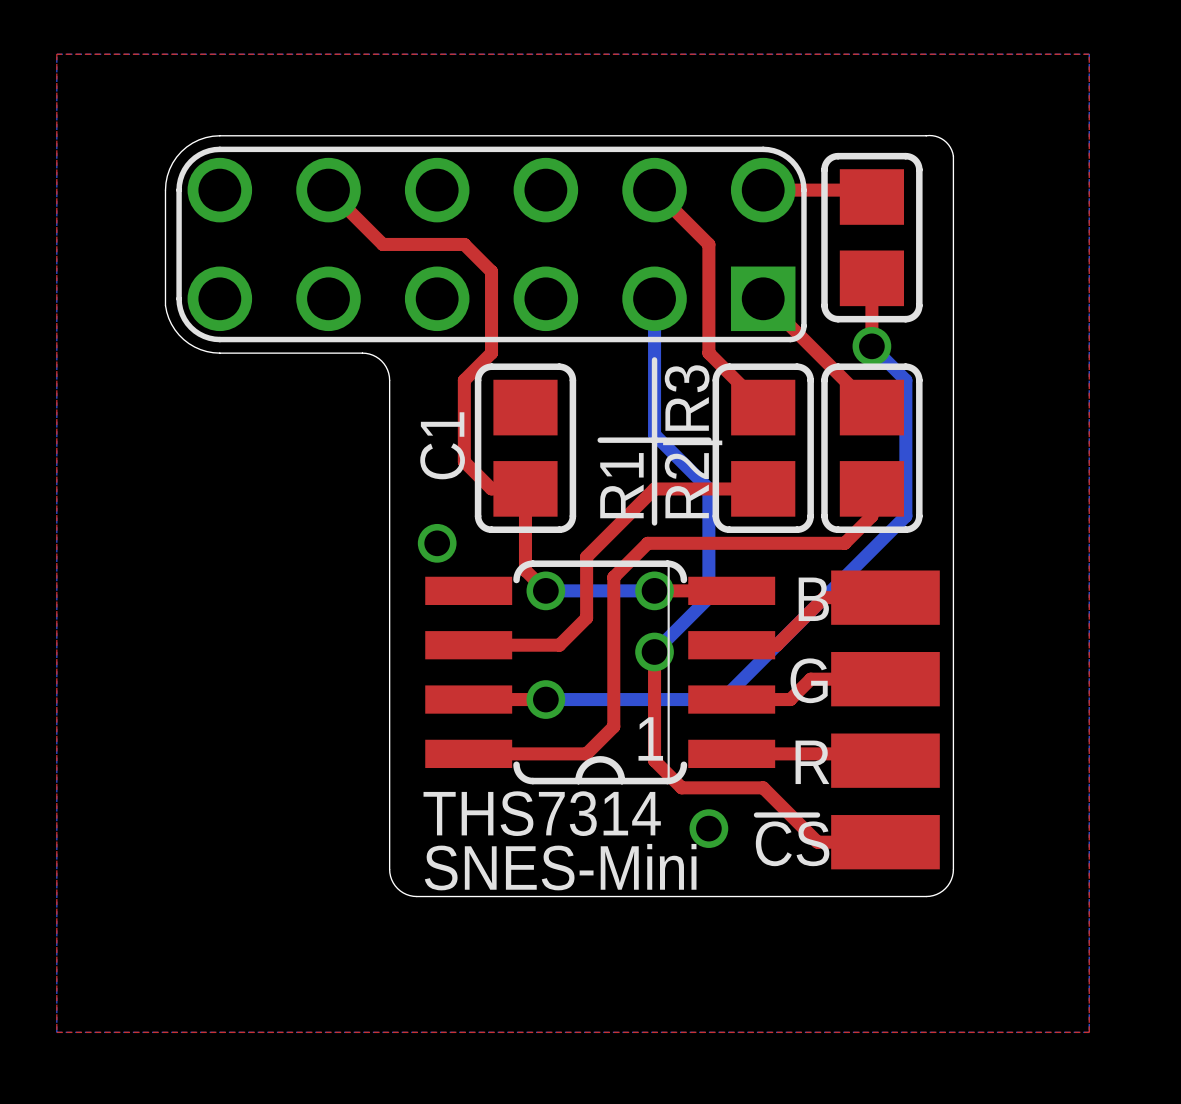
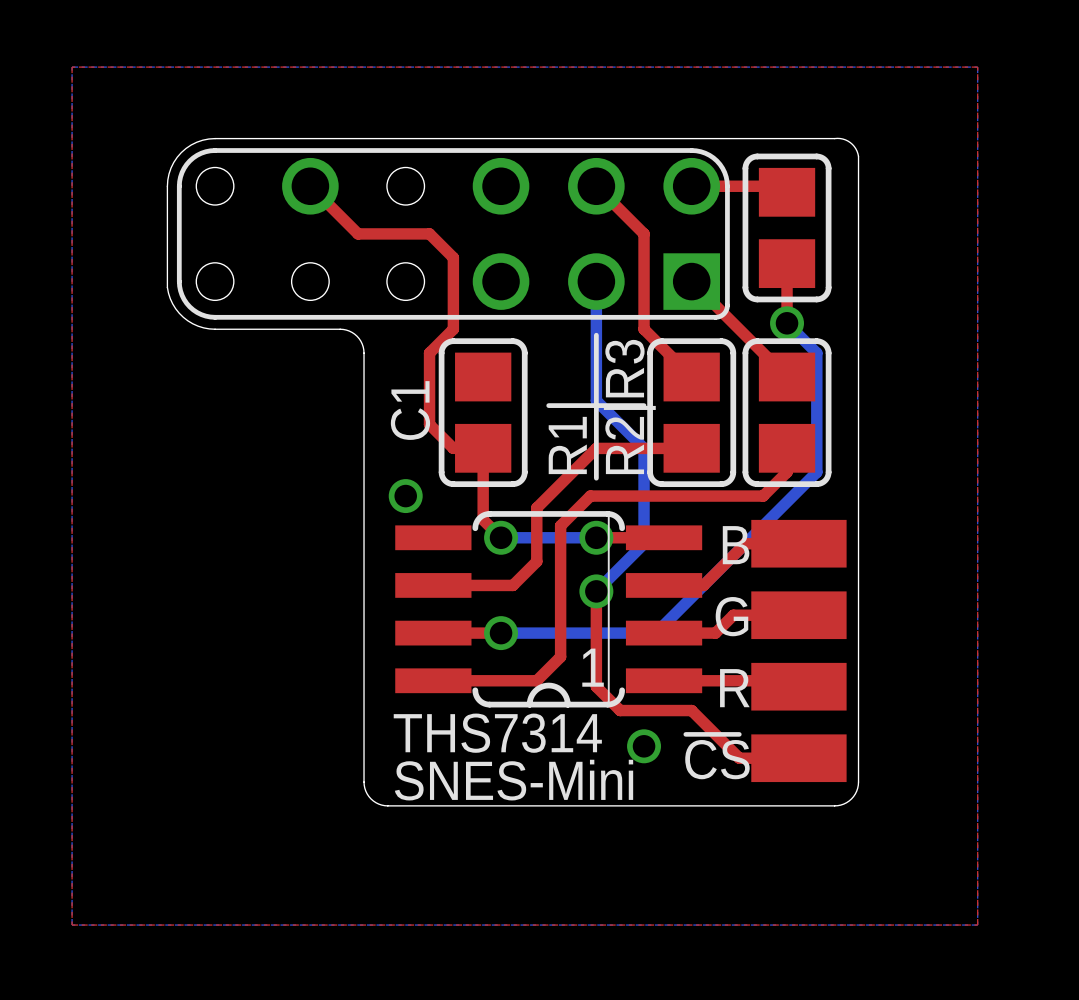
part footprint: [176, 146, 807, 343] -> [176, 148, 730, 320]

